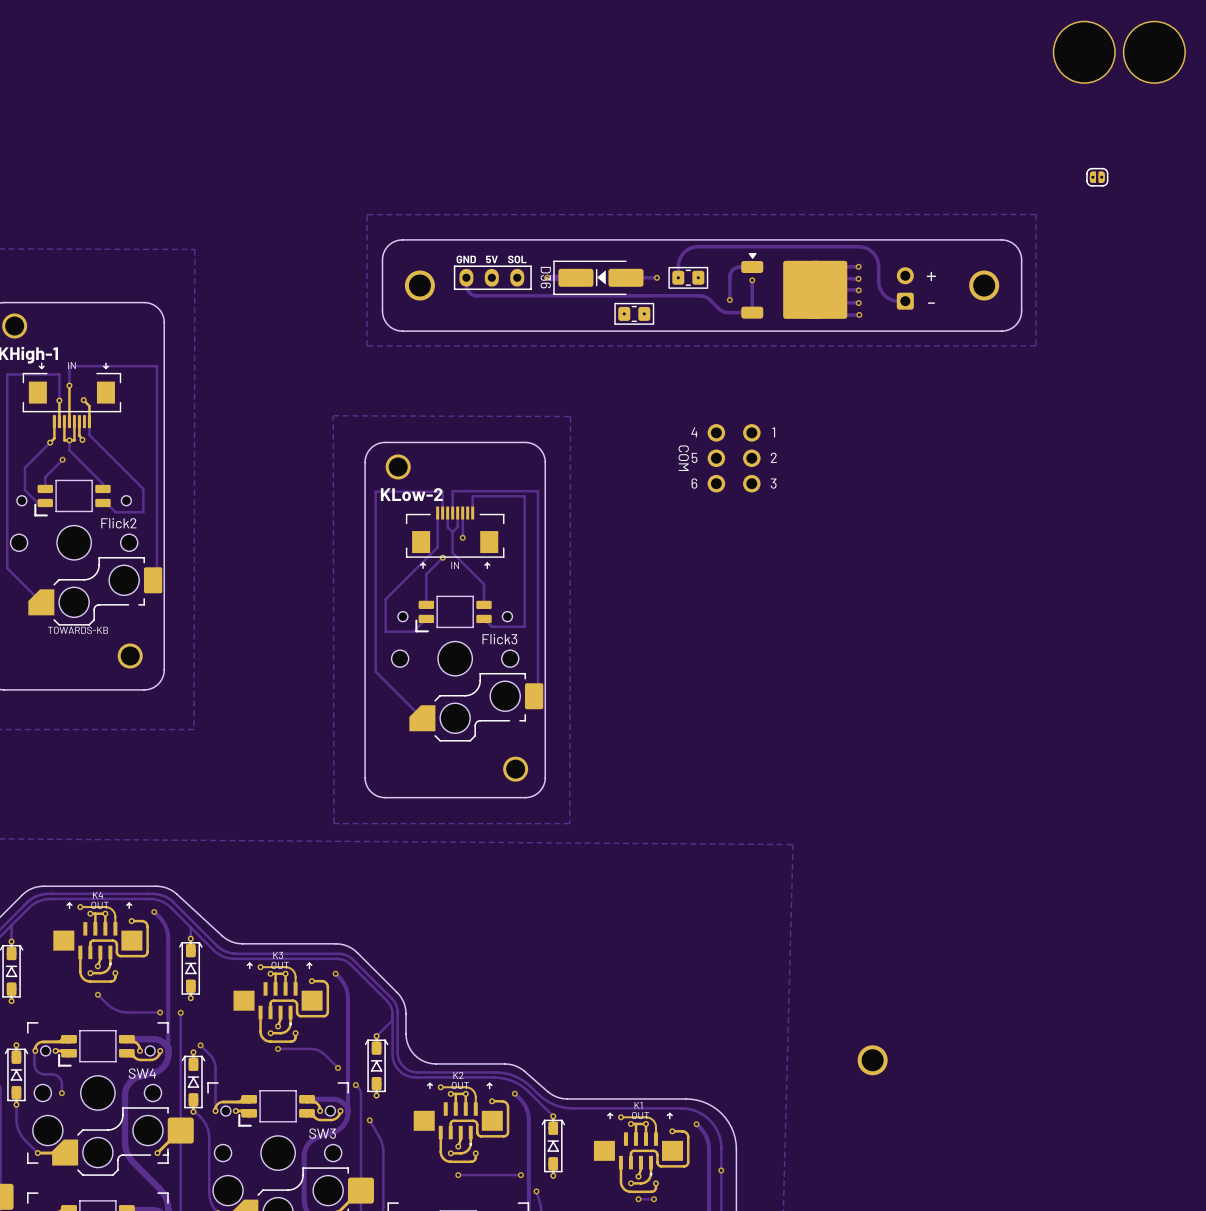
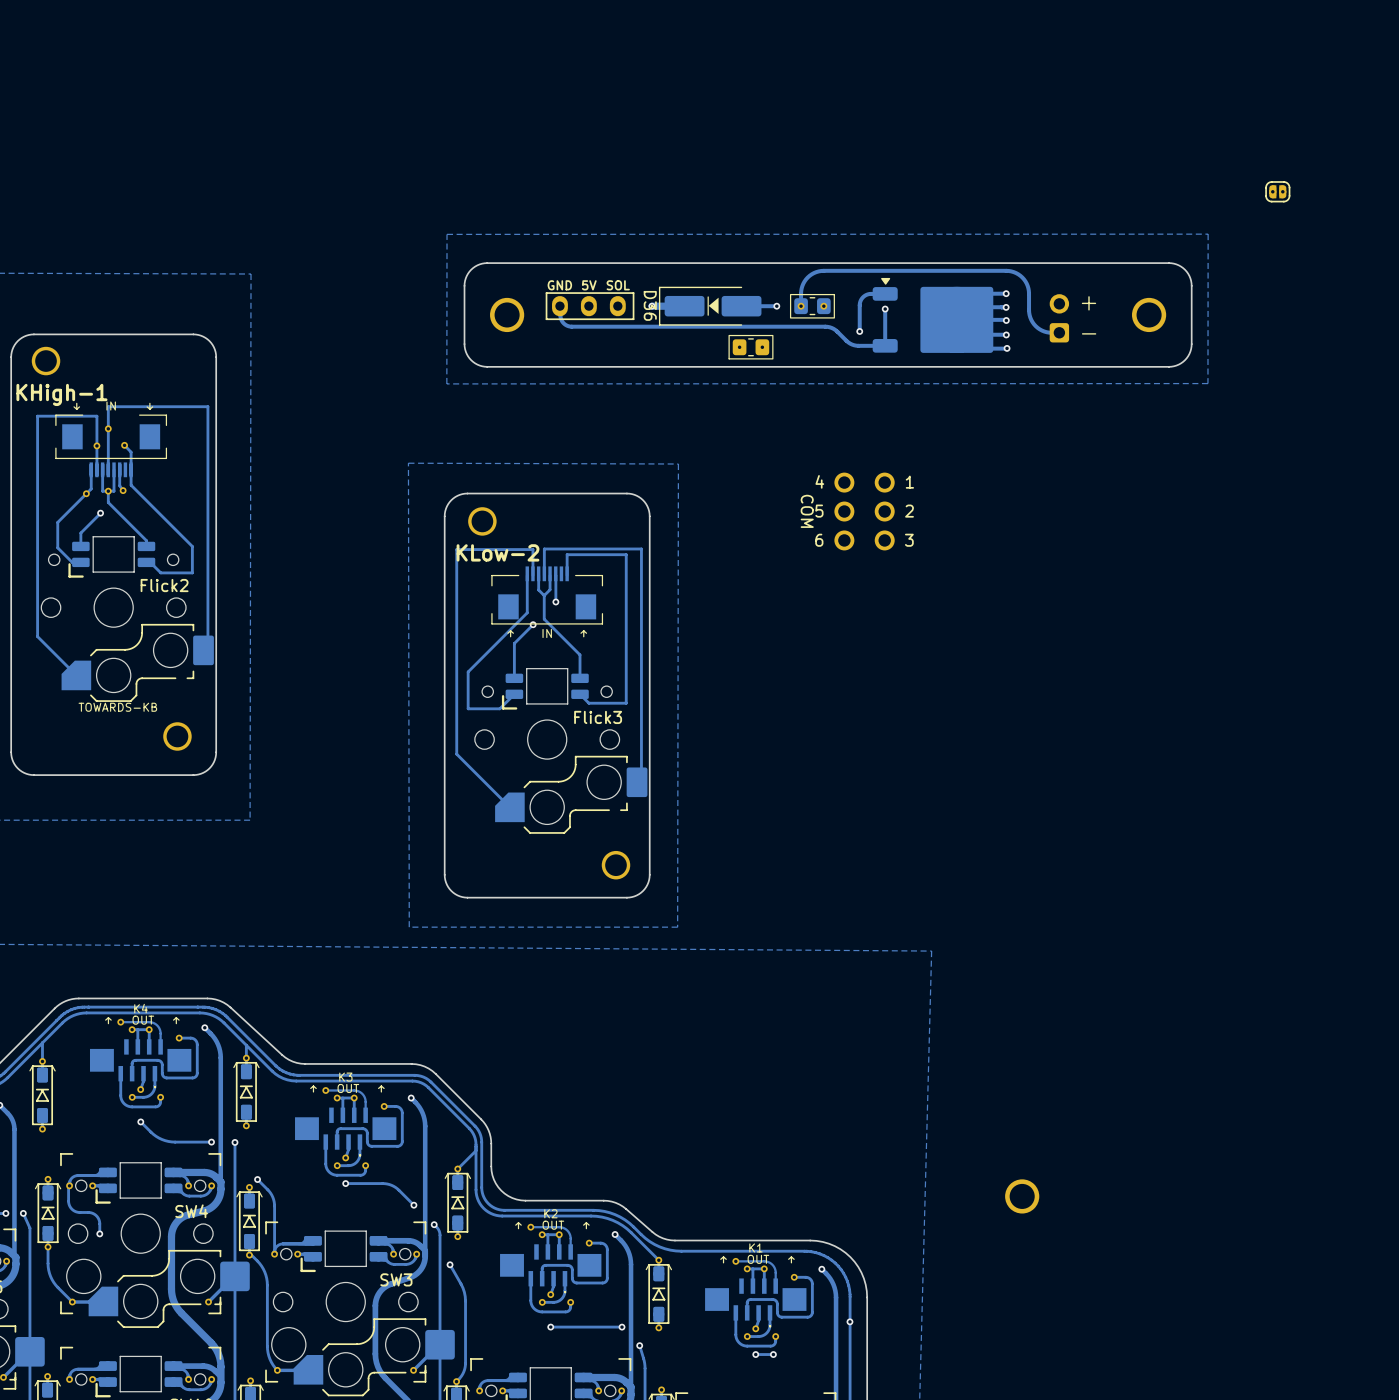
part: (1084, 52) -> none
part: (1154, 52) -> none

